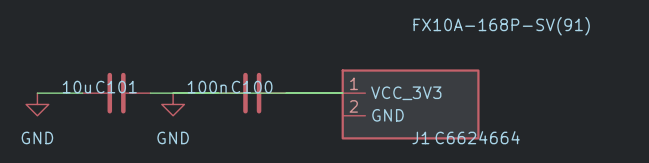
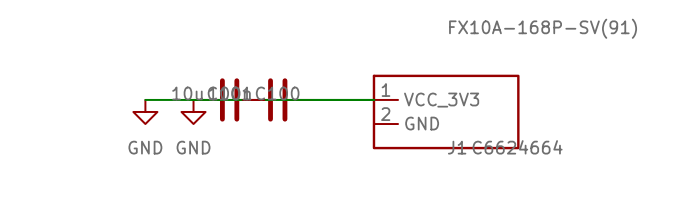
wire: (37, 93) (82, 93) -> none
C101 position: (116, 93) -> (229, 99)
power symbol position: GND (37, 104) -> GND (145, 111)

